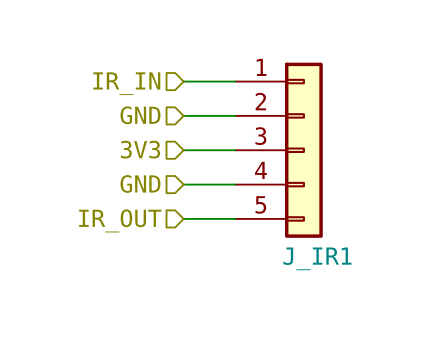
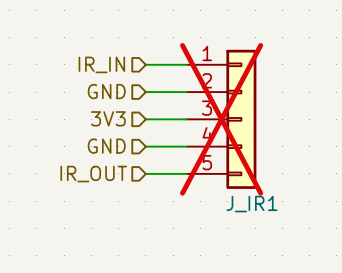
J_IR1 do-not-place cross: none -> (221, 119)

